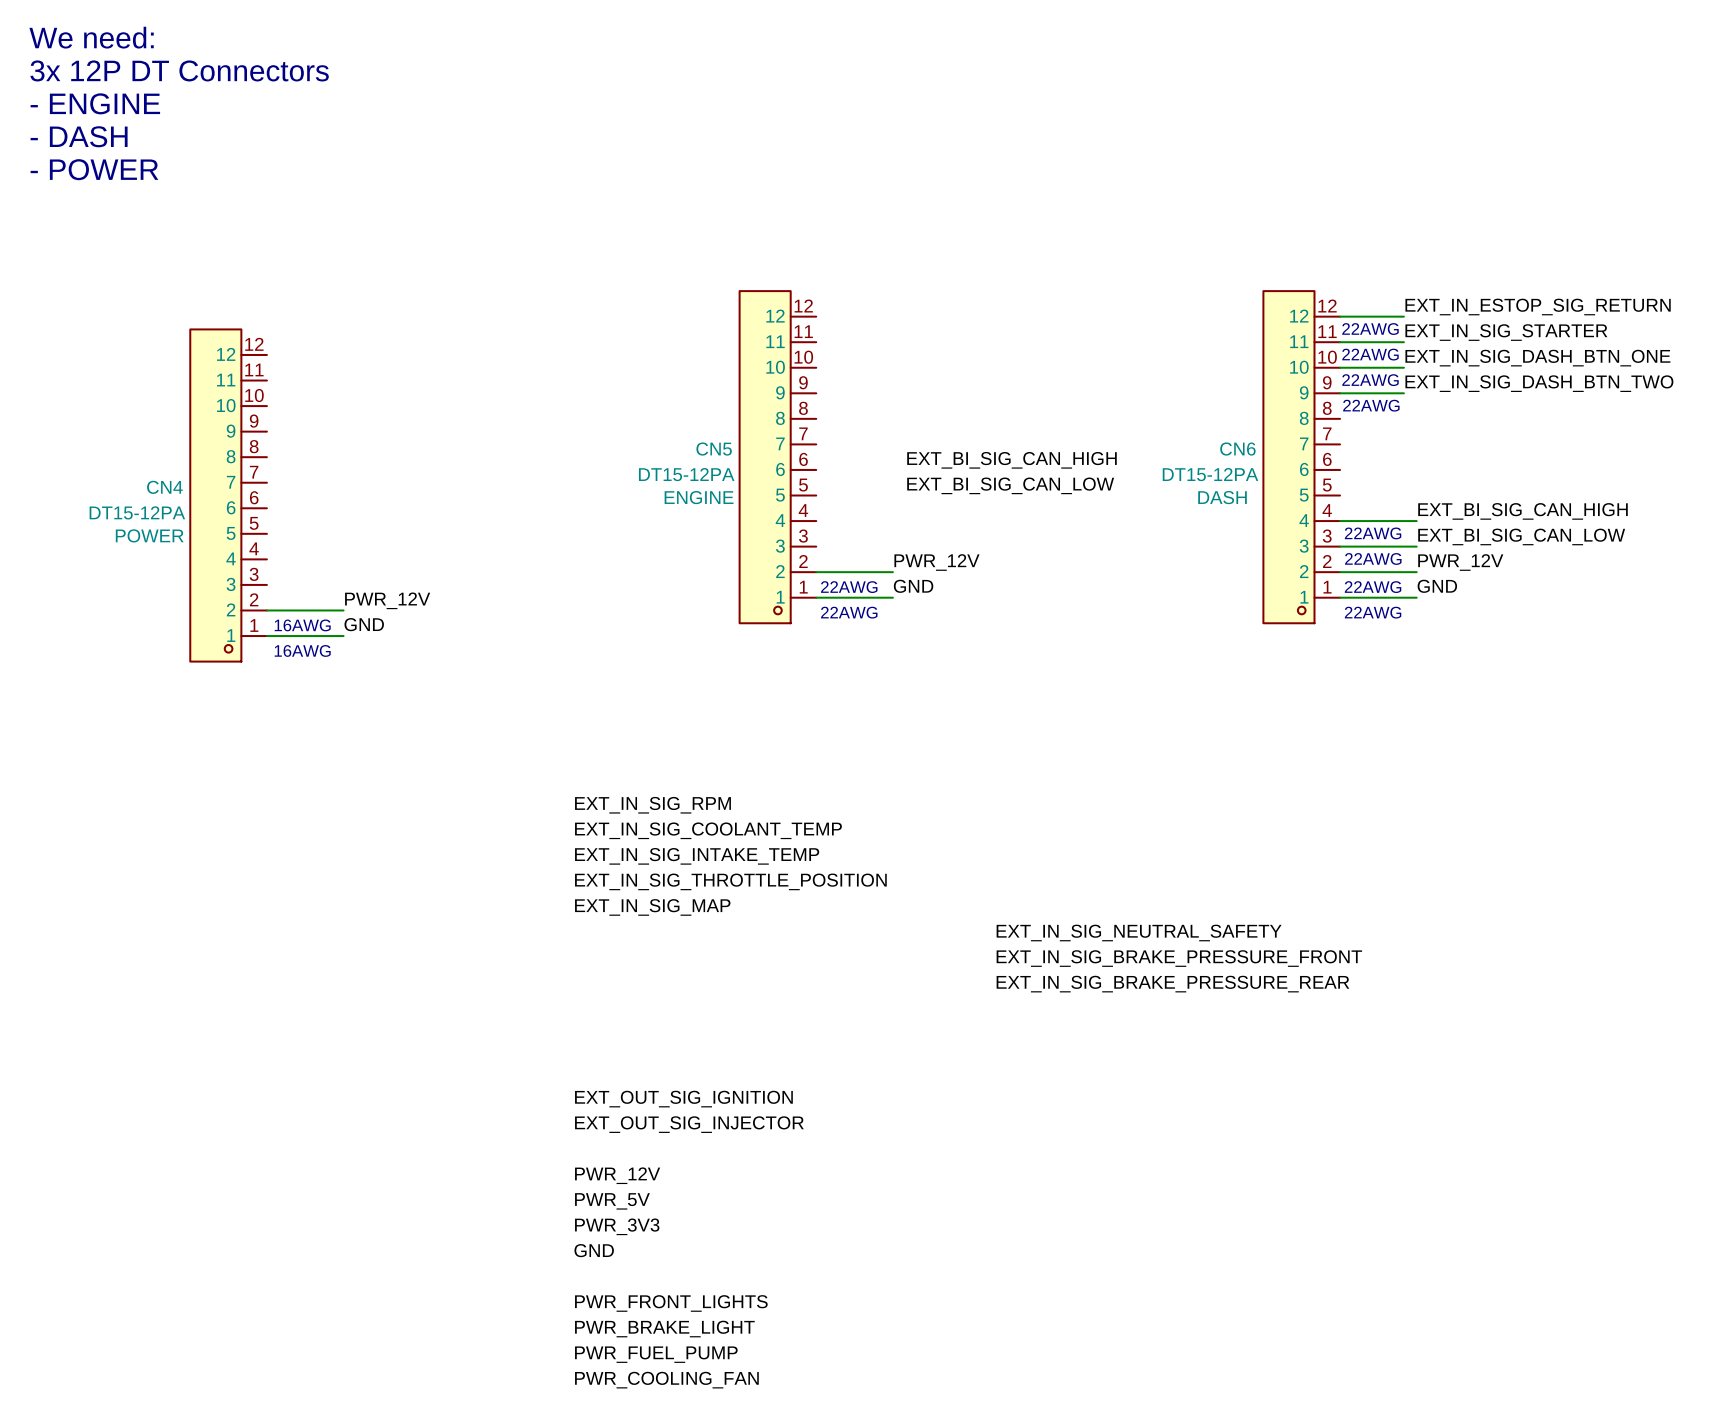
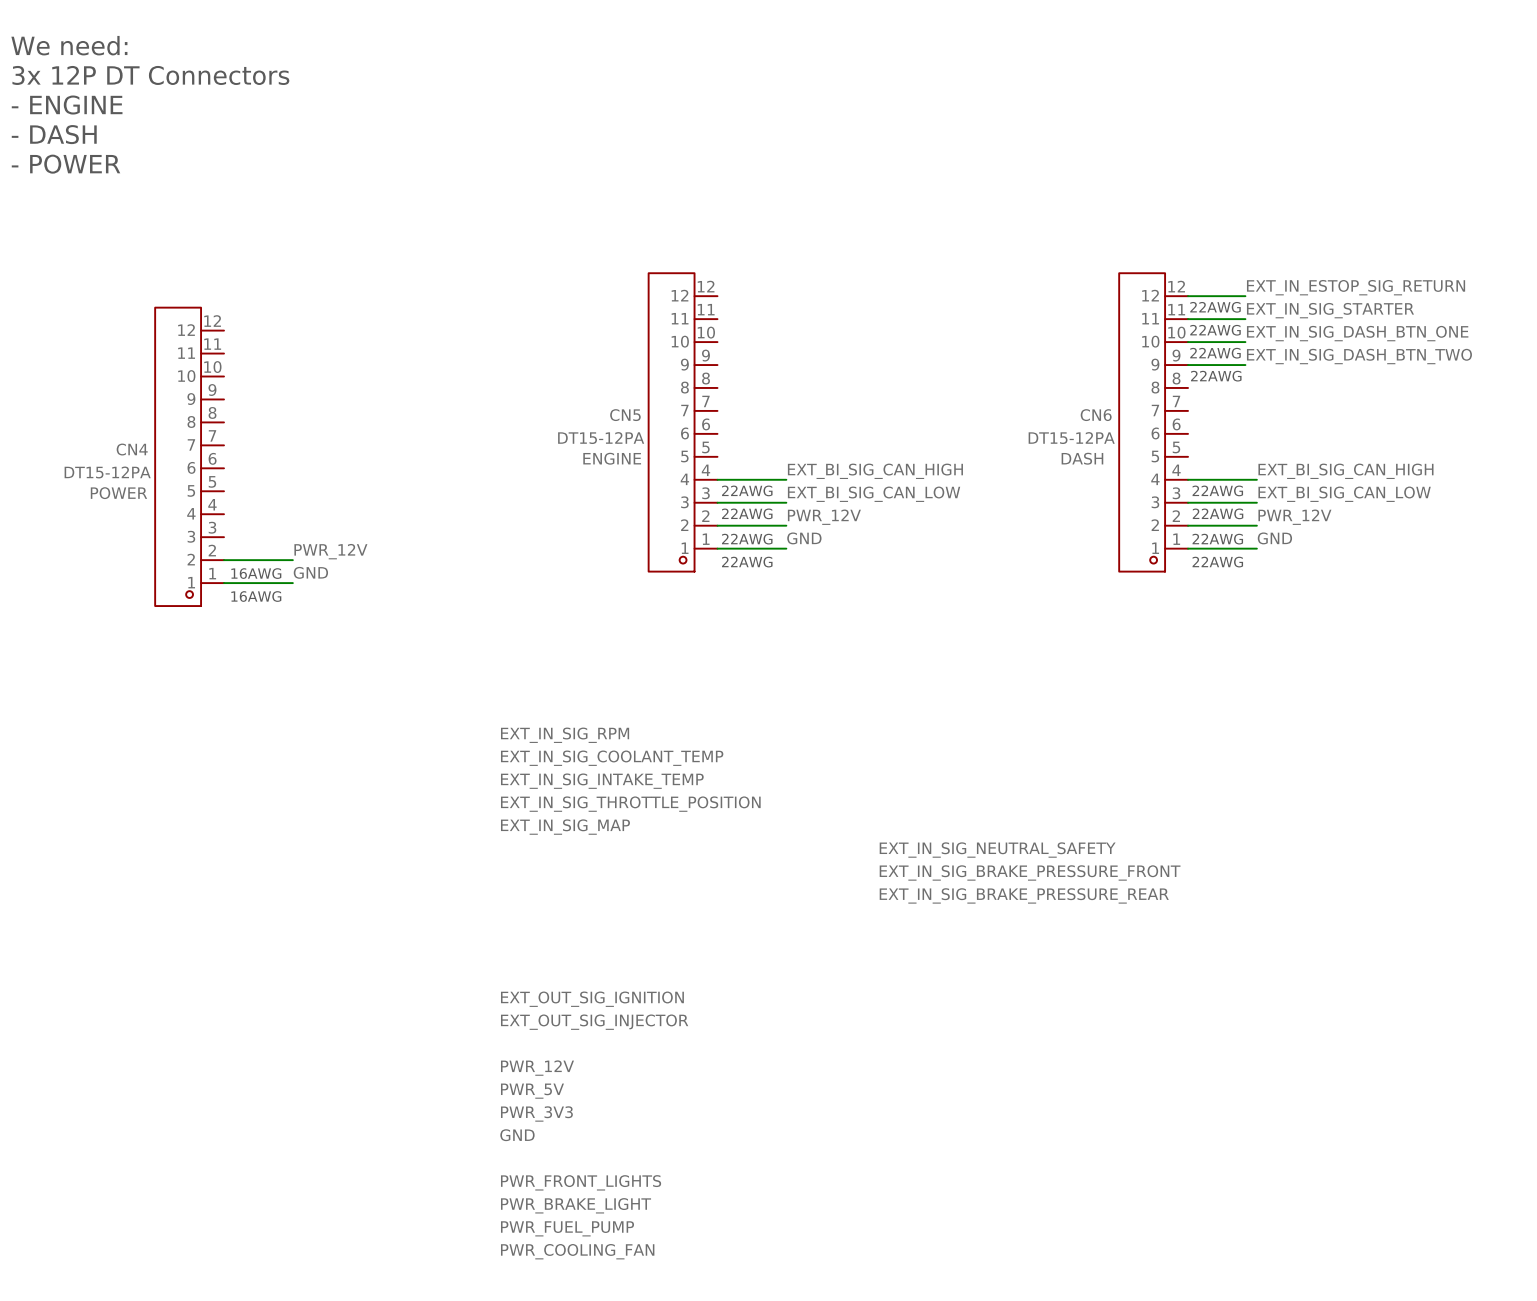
label position: EXT_BI_SIG_CAN_HIGH (1011, 460) -> EXT_BI_SIG_CAN_HIGH (875, 471)
label position: EXT_BI_SIG_CAN_LOW (1010, 485) -> EXT_BI_SIG_CAN_LOW (874, 494)
wire: none -> (717, 479) (786, 479)
text: none -> 22AWG (747, 490)
wire: none -> (717, 502) (786, 502)
text: none -> 22AWG (747, 513)

